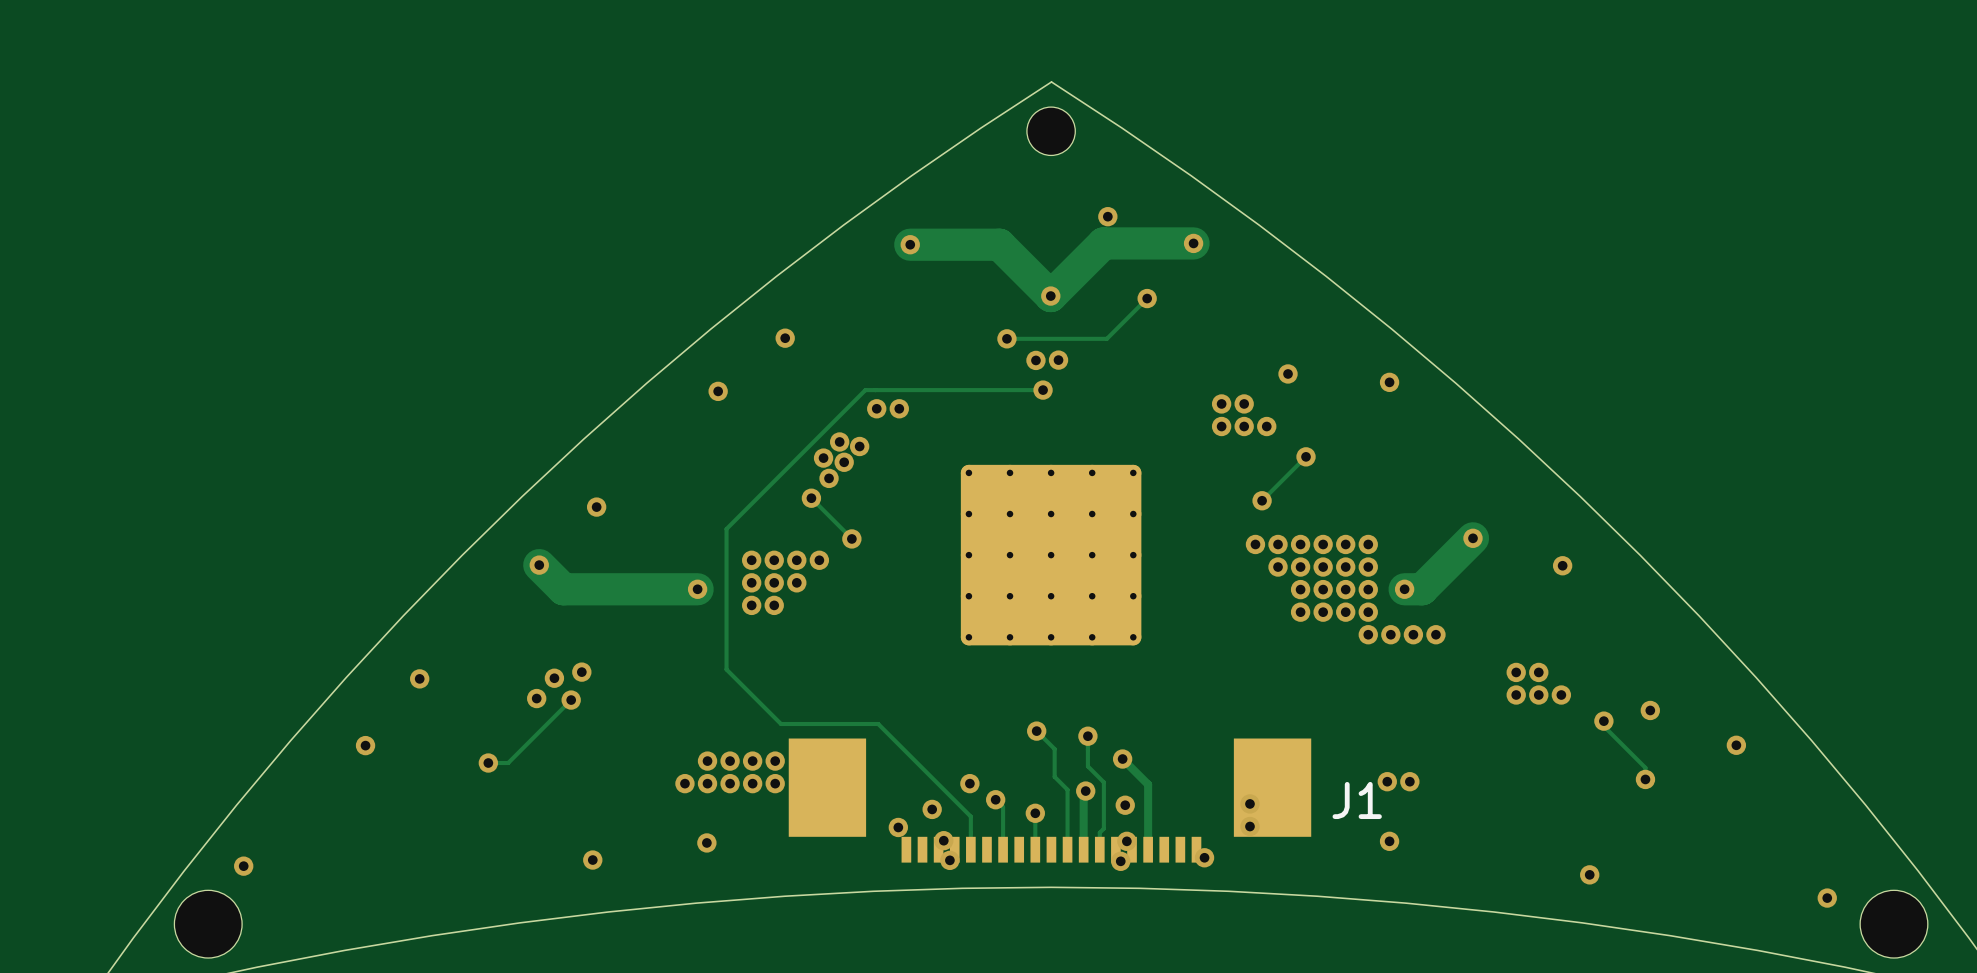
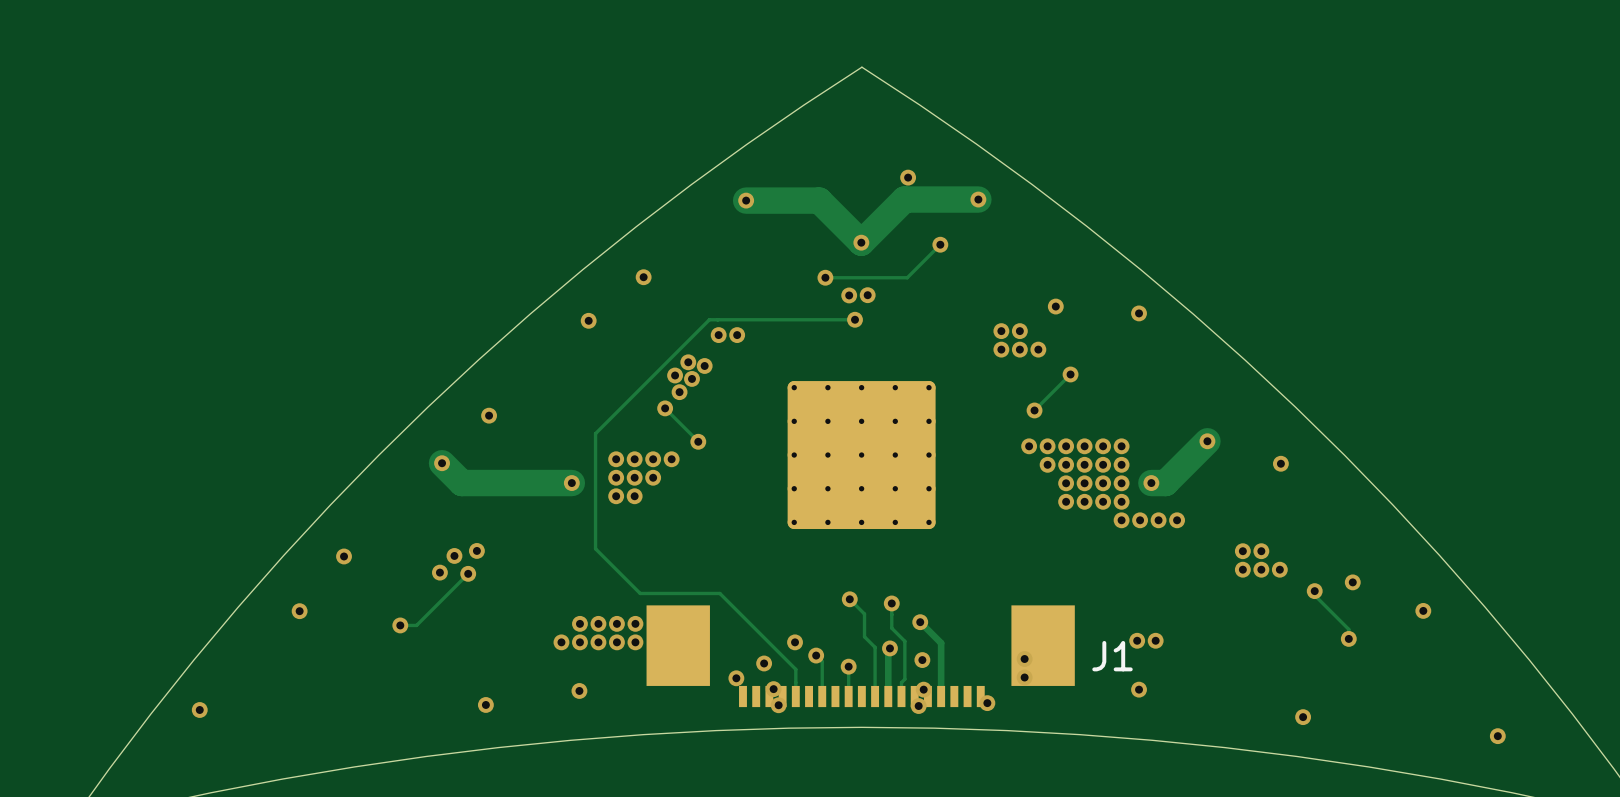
part: (1051, 131) -> none
part: (208, 924) -> none
part: (1893, 924) -> none

